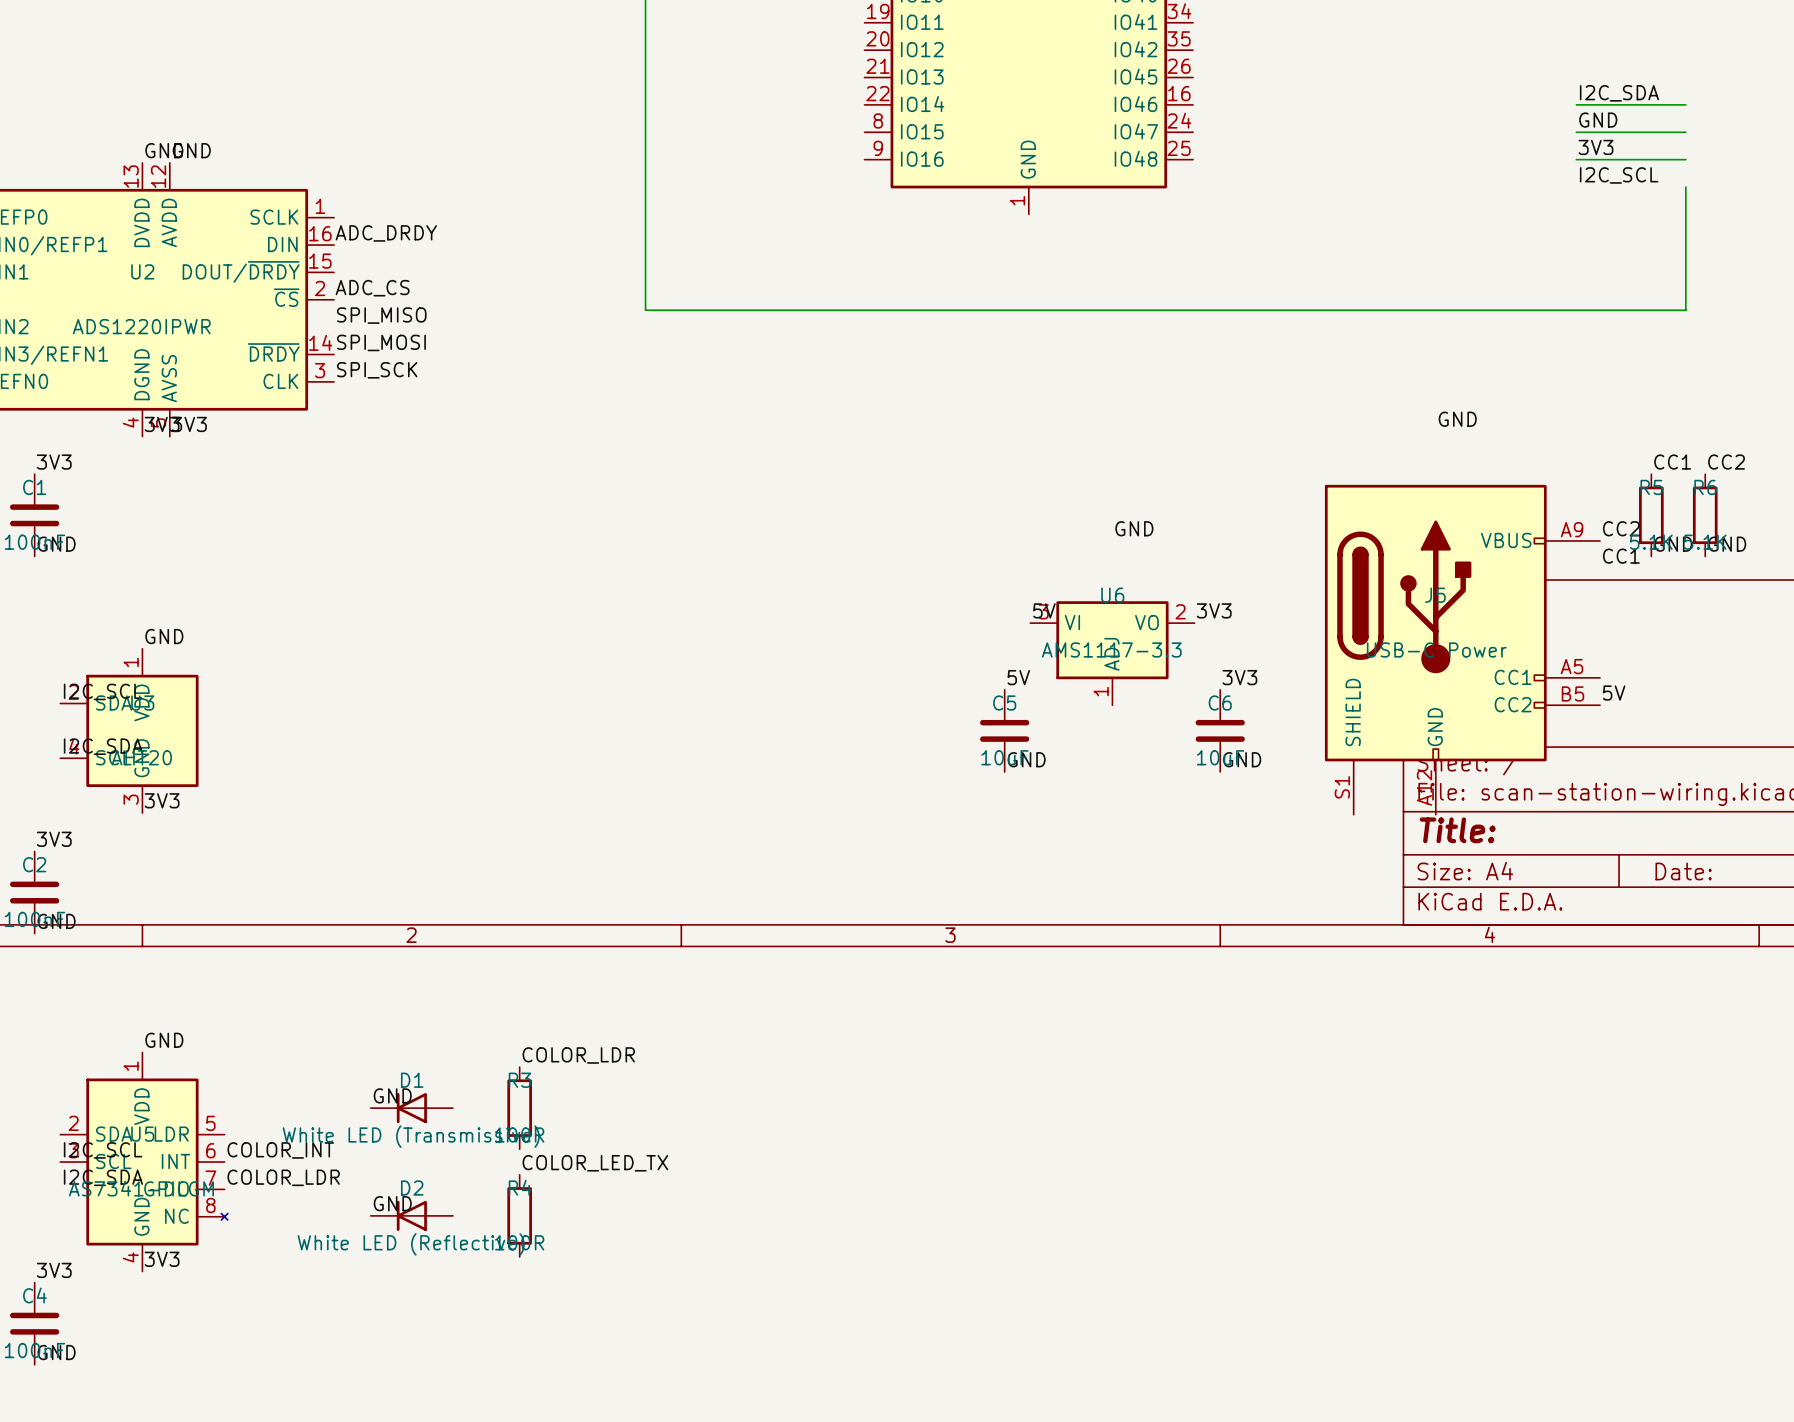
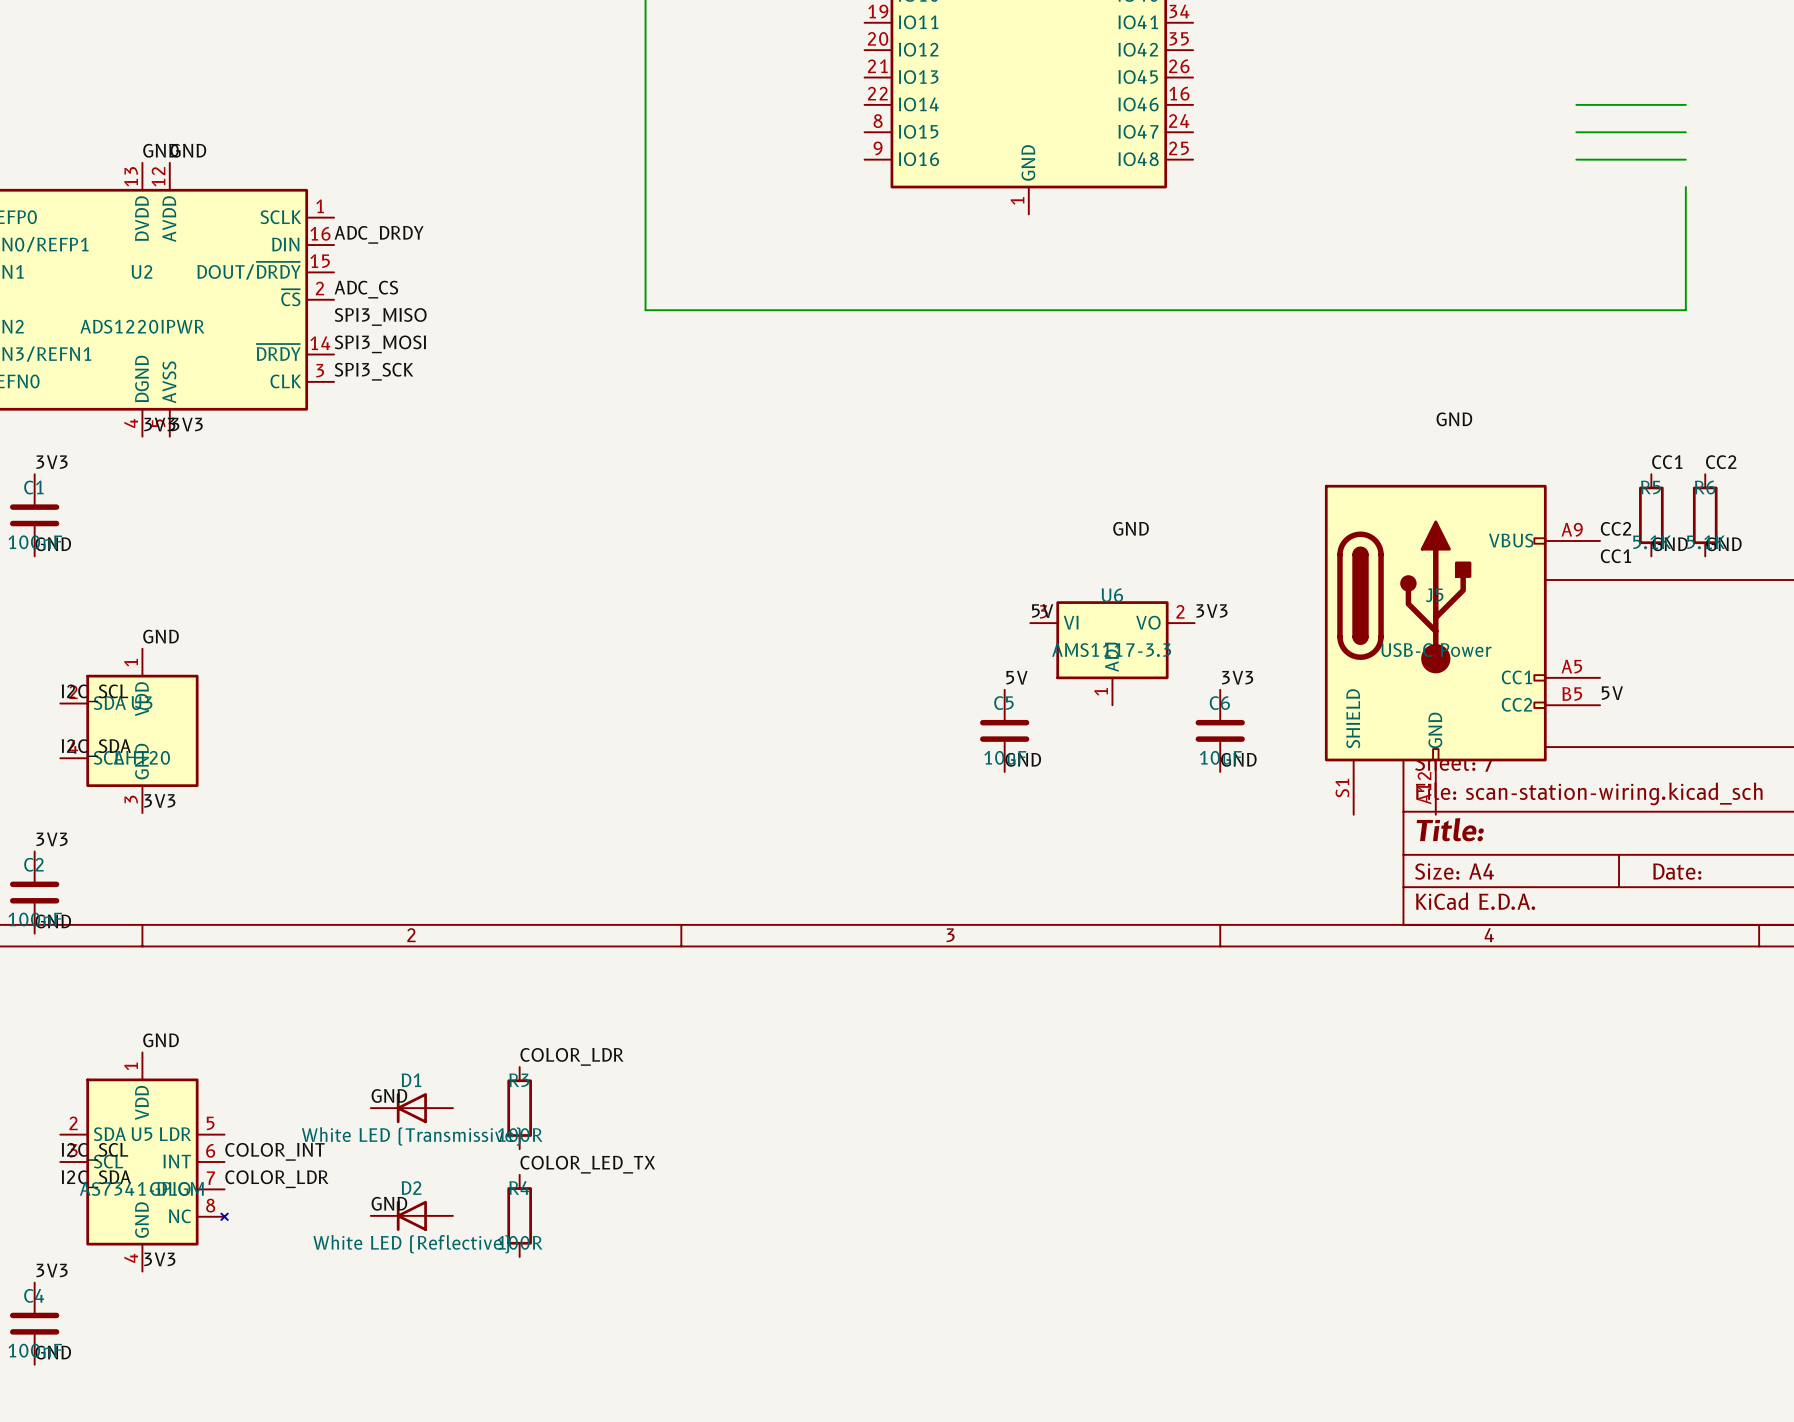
label: I2C_SDA (1619, 93) -> none
label: GND (1598, 120) -> none
label: 3V3 (1595, 147) -> none
label: I2C_SCL (1619, 175) -> none
label: SPI_MISO (381, 315) -> SPI3_MISO (380, 316)
label: SPI_MOSI (381, 342) -> SPI3_MOSI (380, 344)
label: SPI_SCK (377, 370) -> SPI3_SCK (374, 371)

